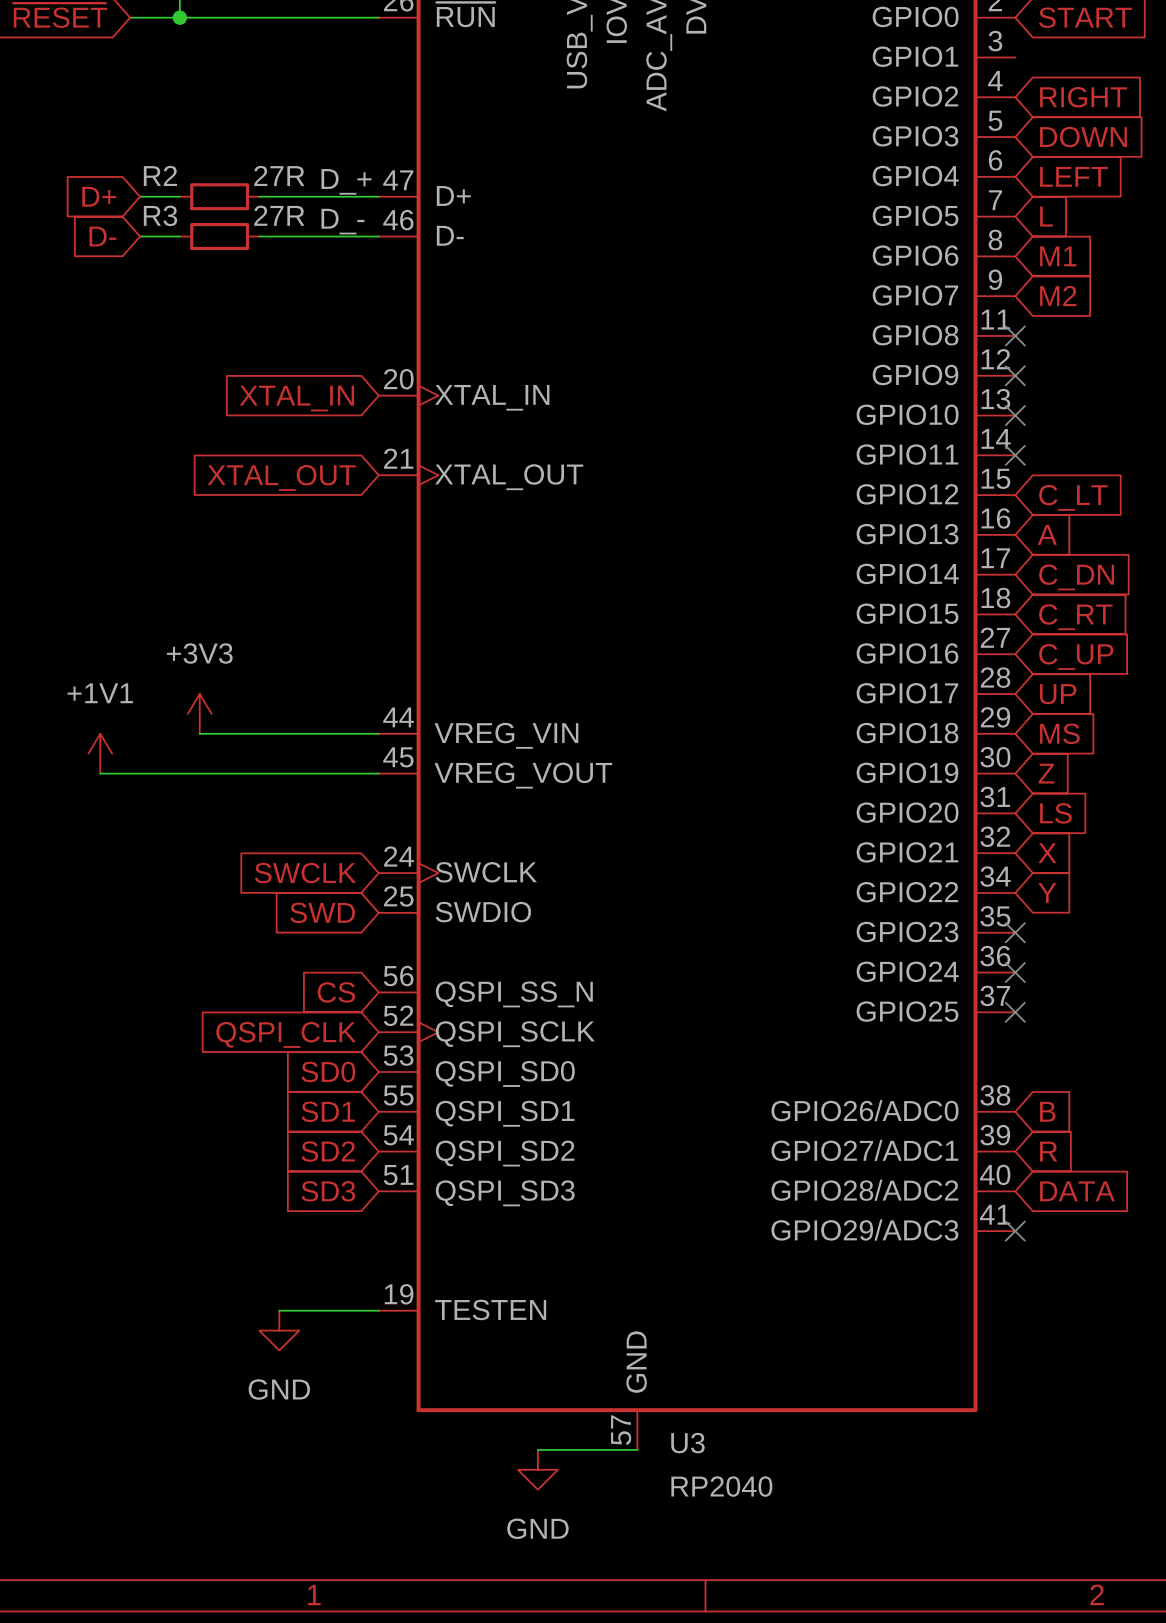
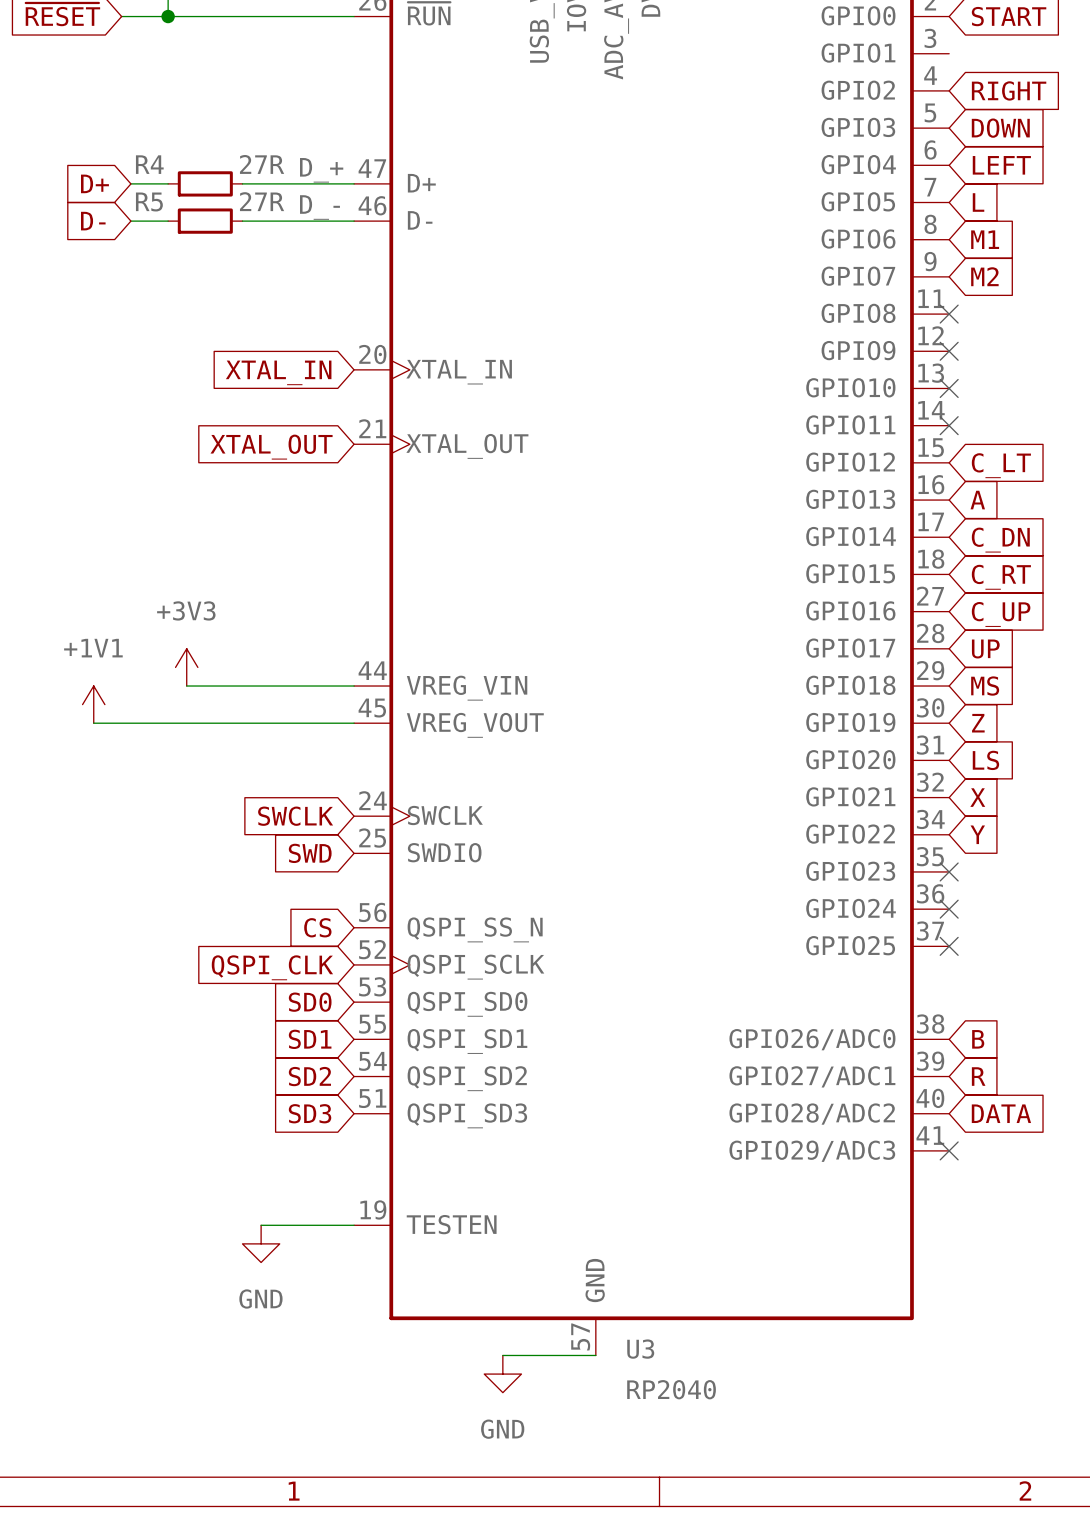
R2 name: R2 (160, 175) -> R4 (149, 164)
R3 name: R3 (160, 215) -> R5 (149, 201)

